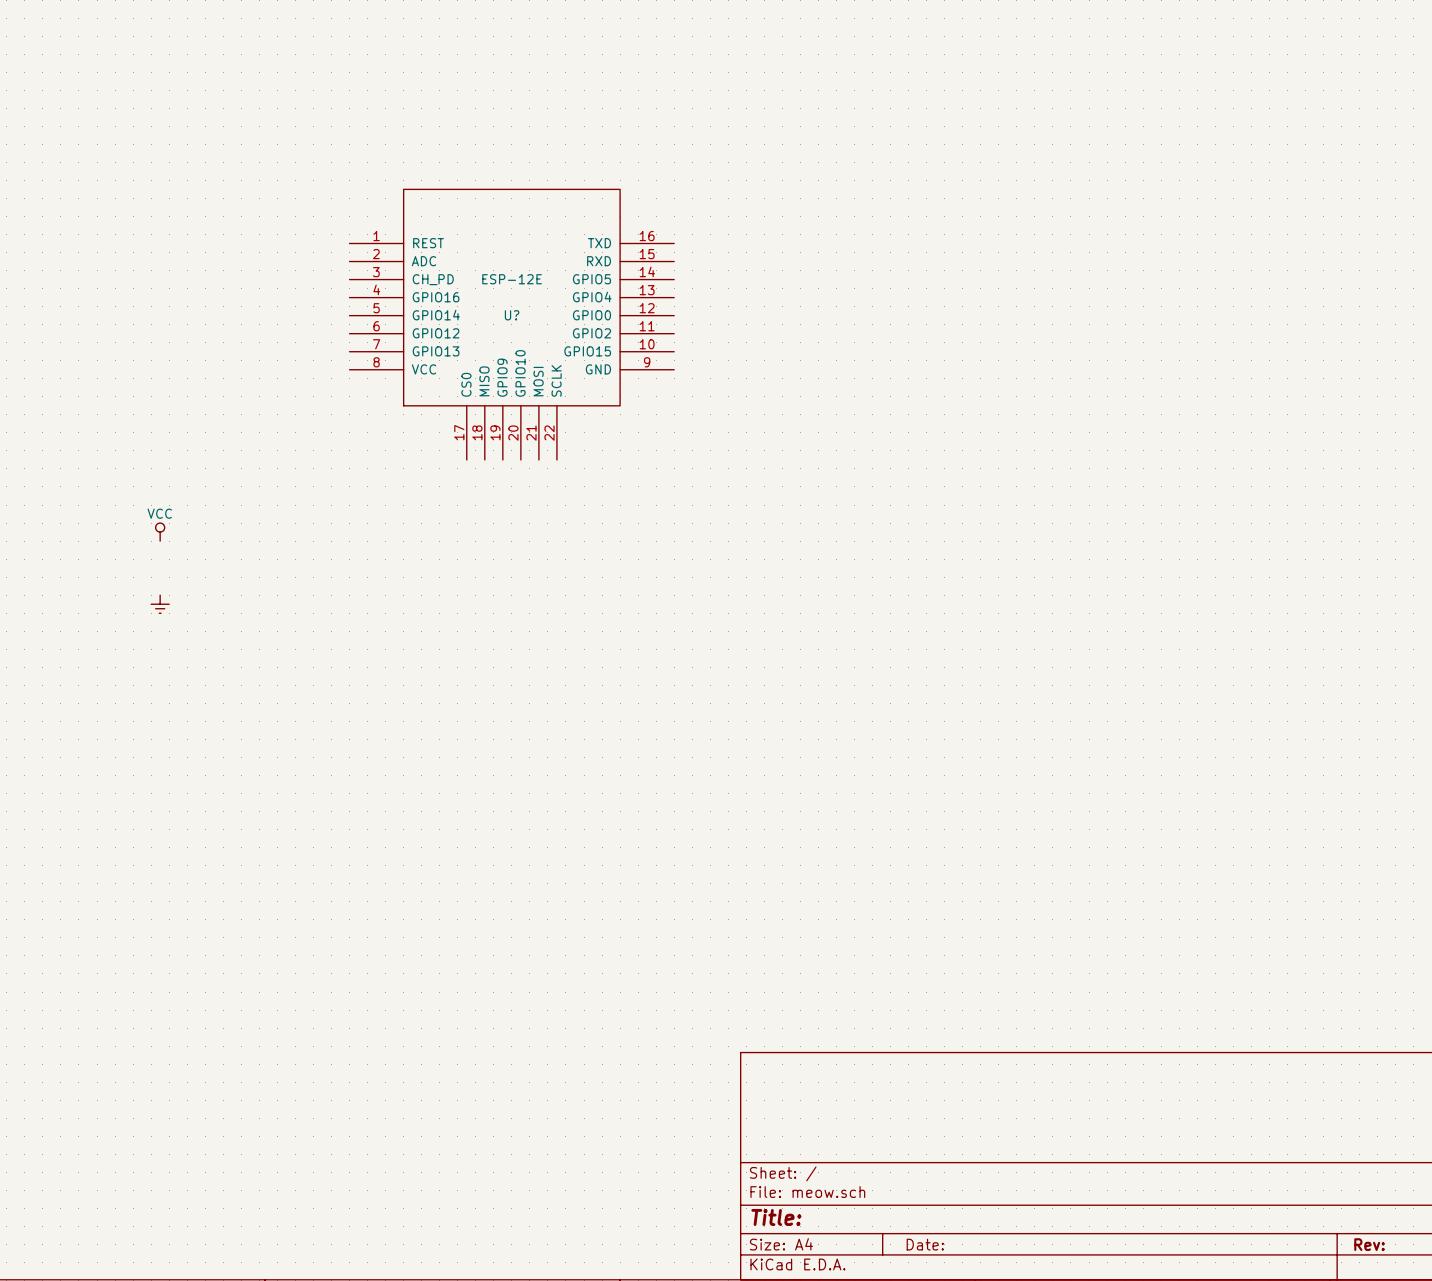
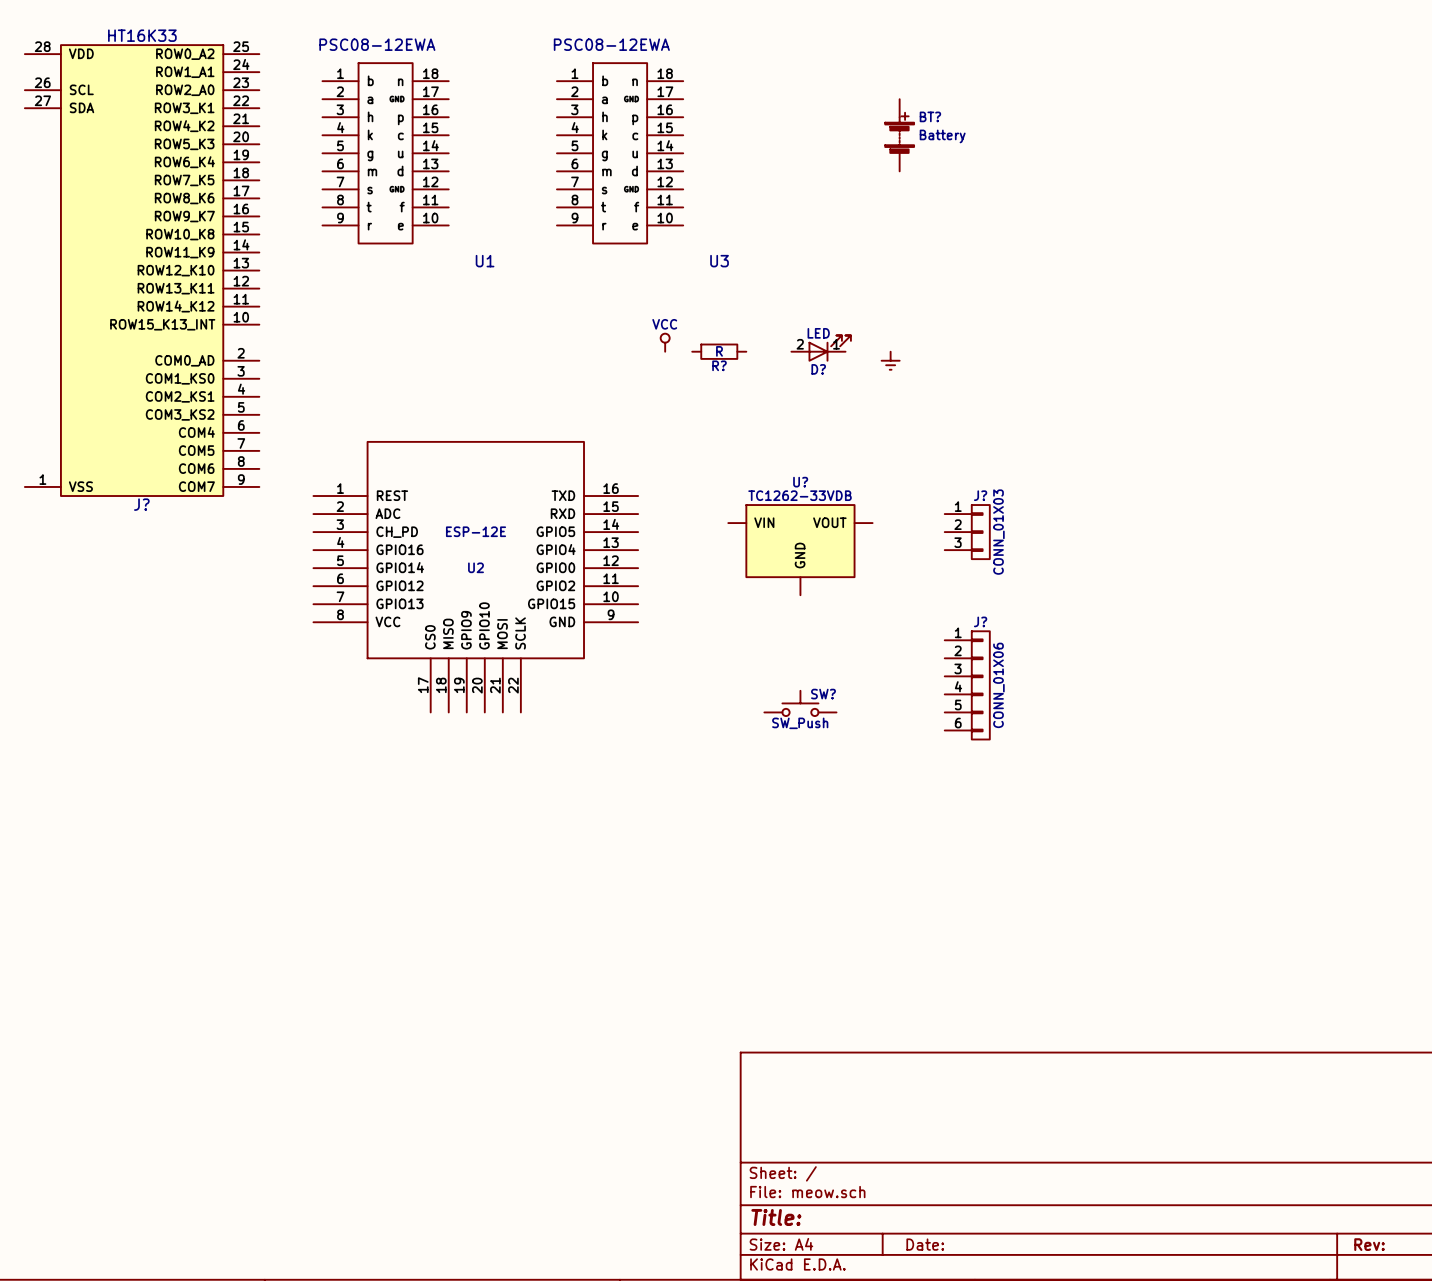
BT?: none -> Battery (899, 135)
U1: none -> PSC08-12EWA (385, 153)
U3: none -> PSC08-12EWA (620, 153)
J?: none -> HT16K33 (142, 270)
U?: ESP-12E (511, 324) -> none
power symbol: none -> VCC (665, 342)
D?: none -> LED (821, 348)
R?: none -> R (719, 351)
power symbol: none -> (890, 360)
power symbol: VCC (160, 532) -> none
J?: none -> CONN_01X03 (967, 532)
U?: none -> TC1262-33VDB (800, 549)
U2: none -> ESP-12E (475, 577)
power symbol: (160, 604) -> none
J?: none -> CONN_01X06 (967, 685)
SW?: none -> SW_Push (800, 703)

